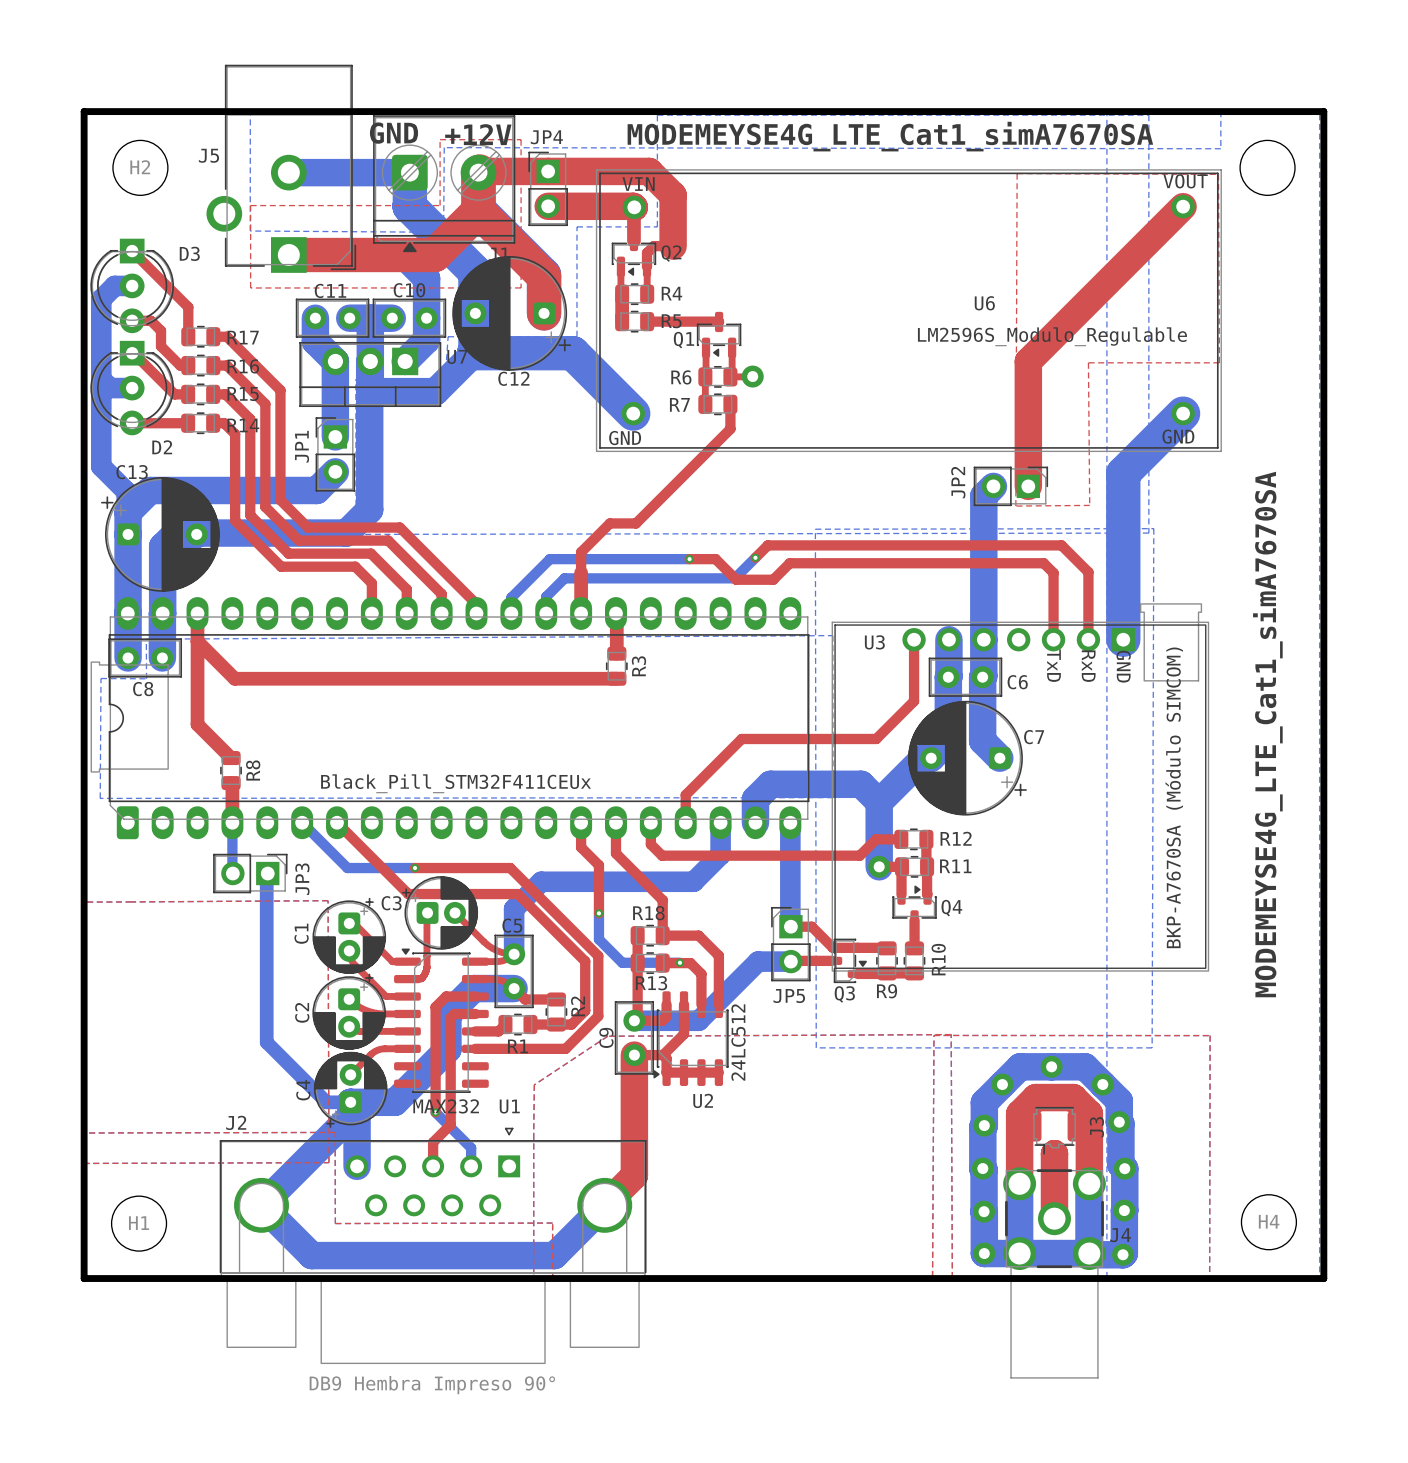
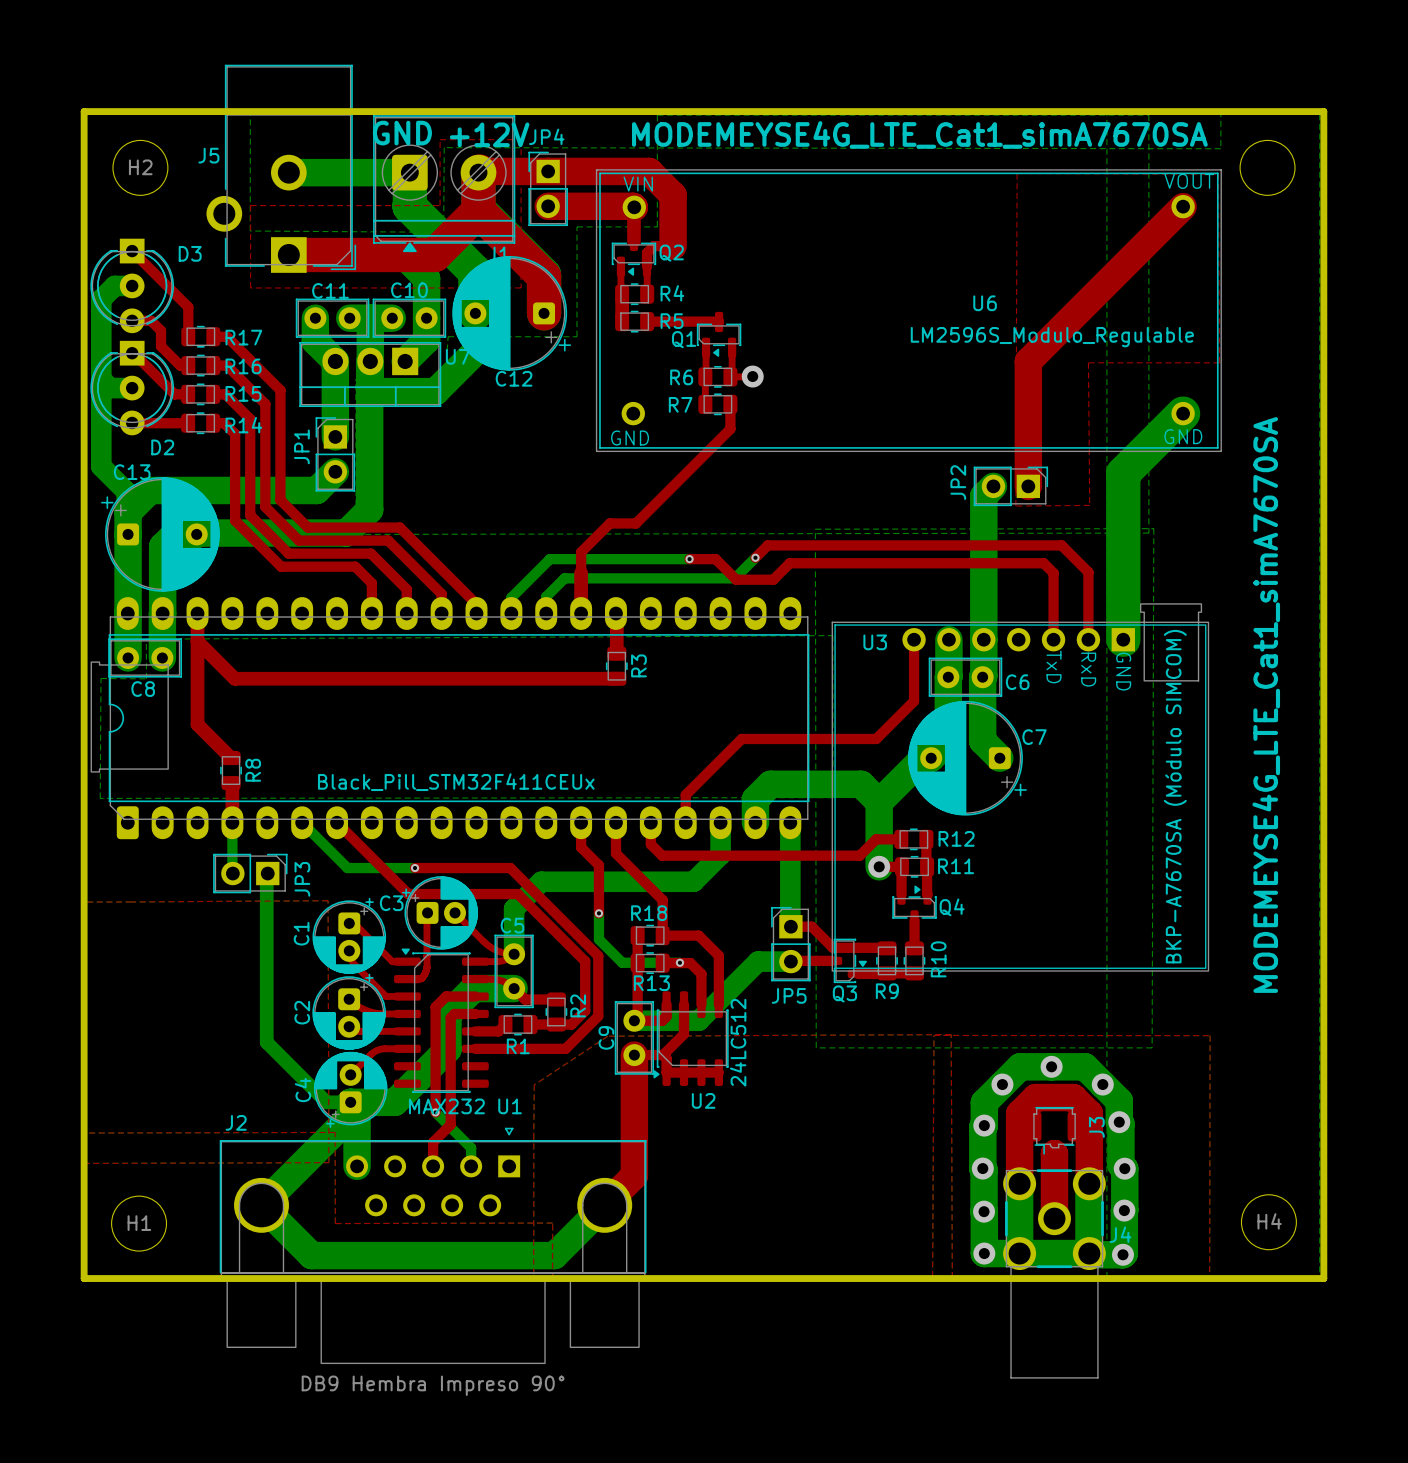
bottom track: (475, 313) (474, 353) (572, 353) (633, 413) -> none

